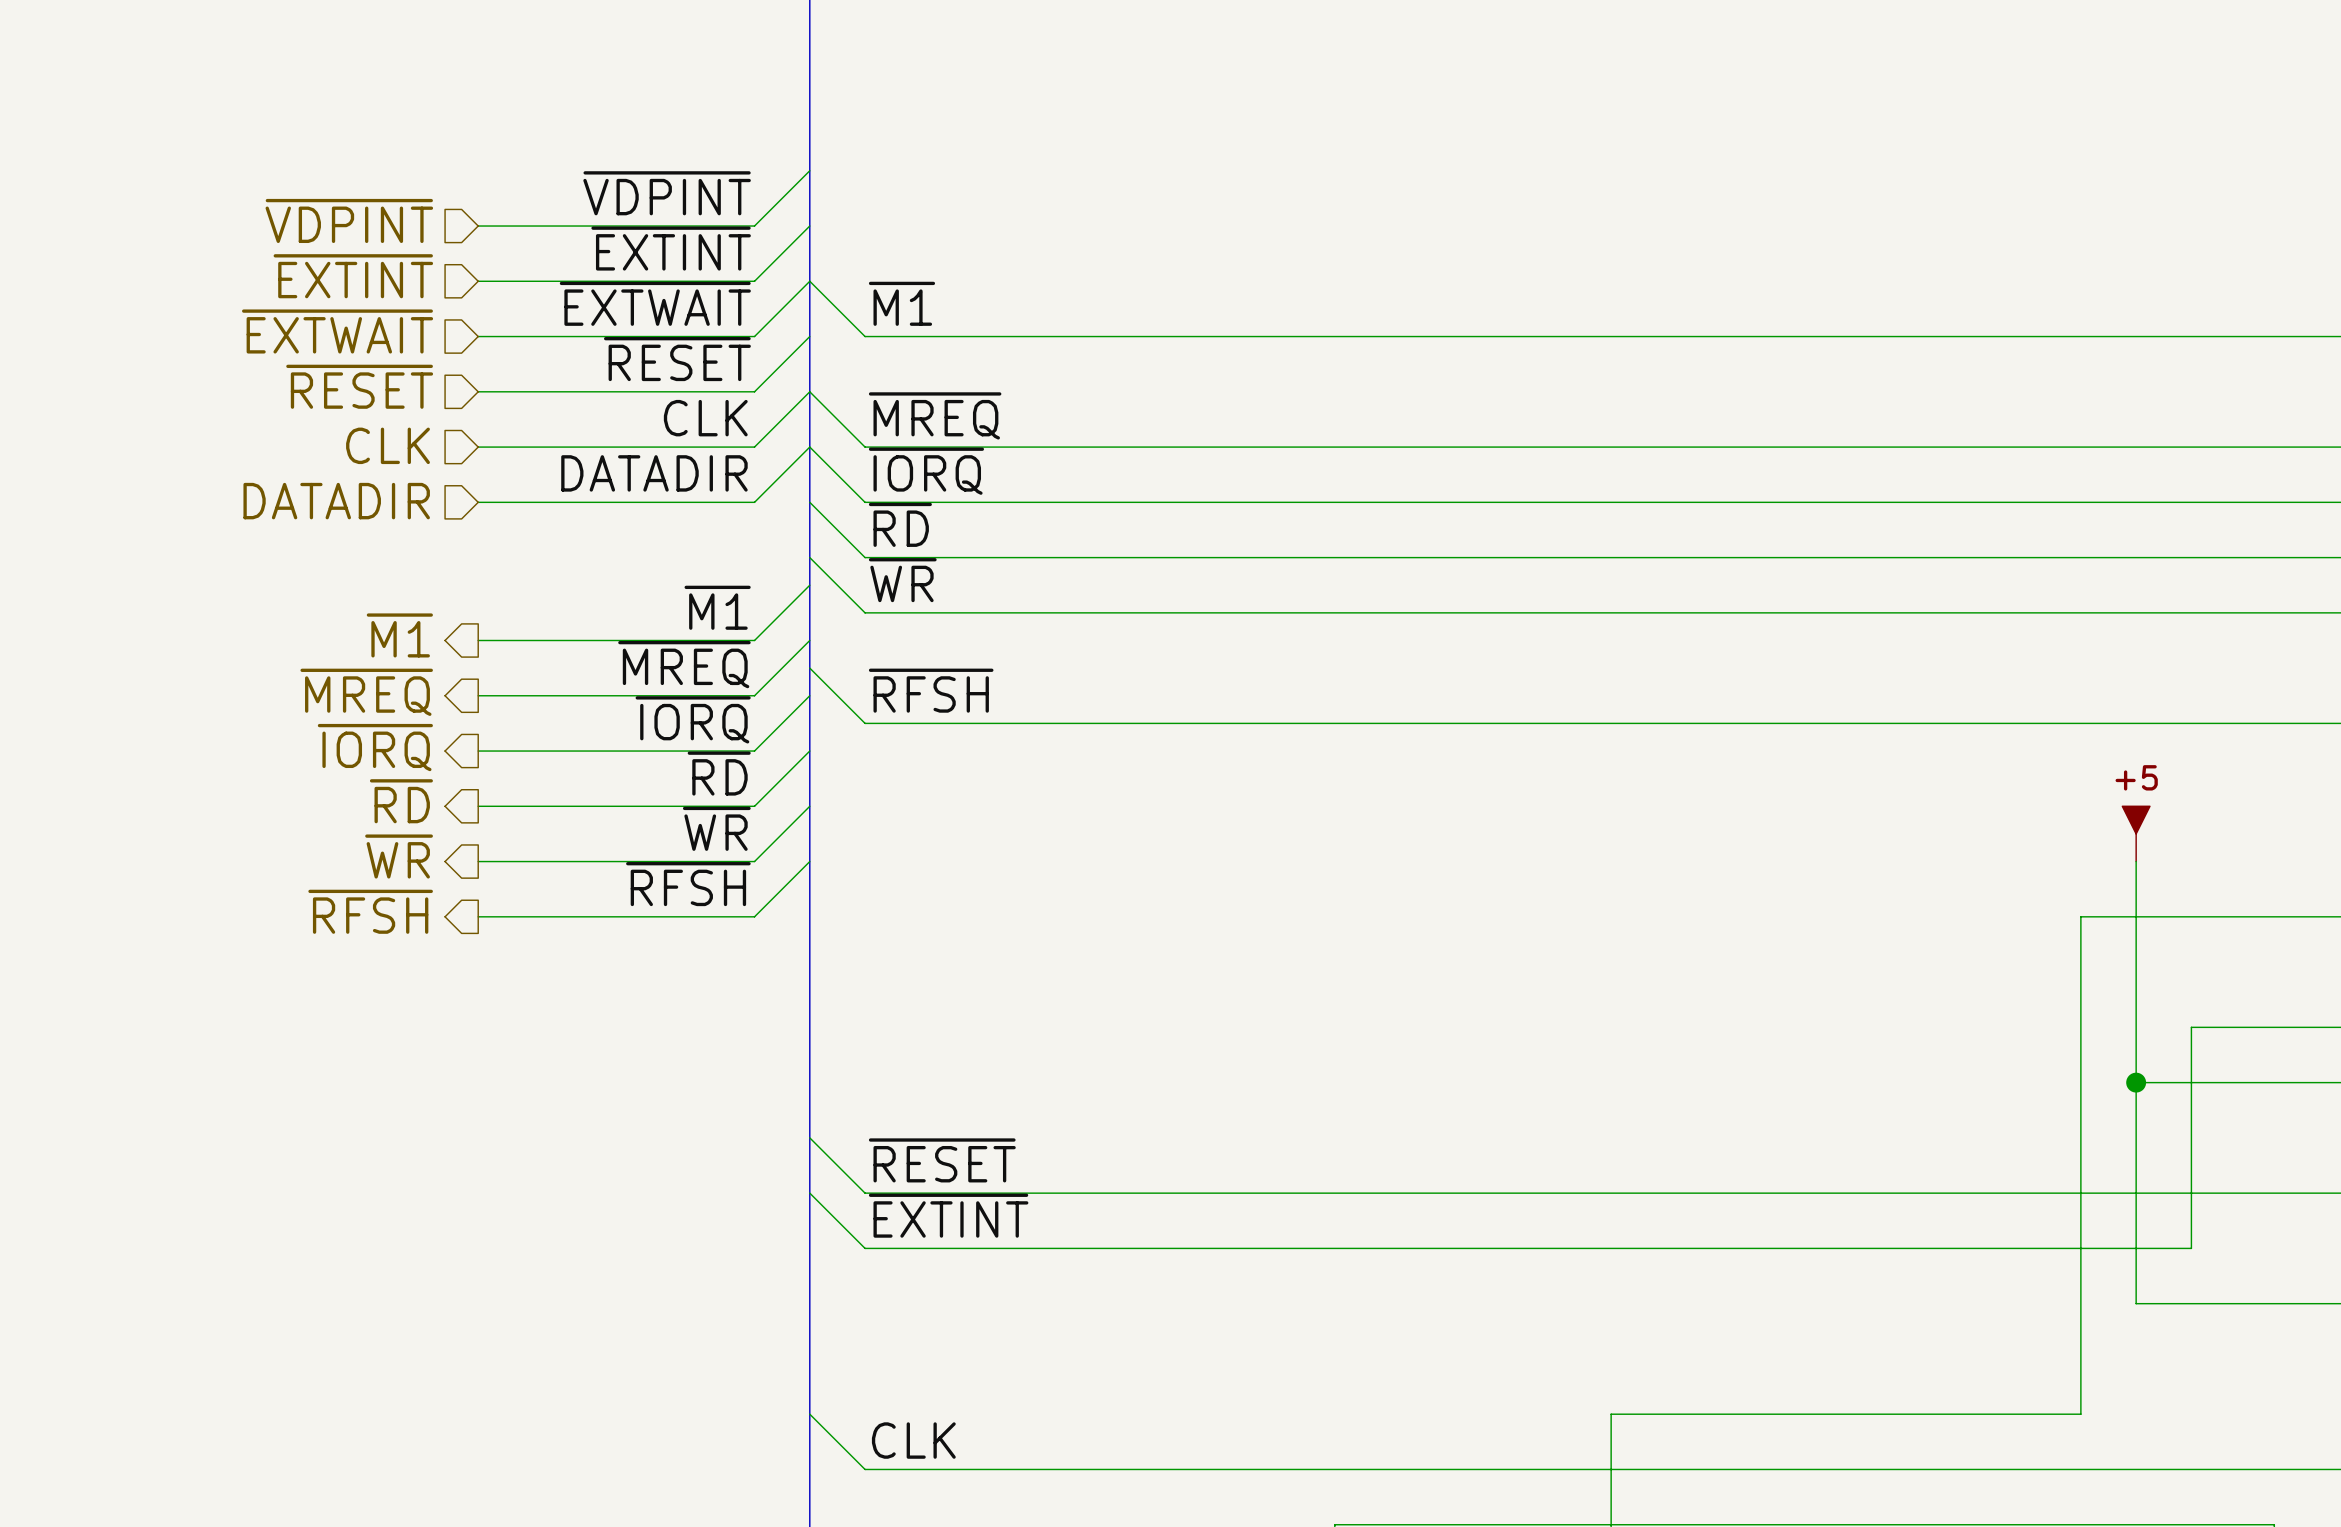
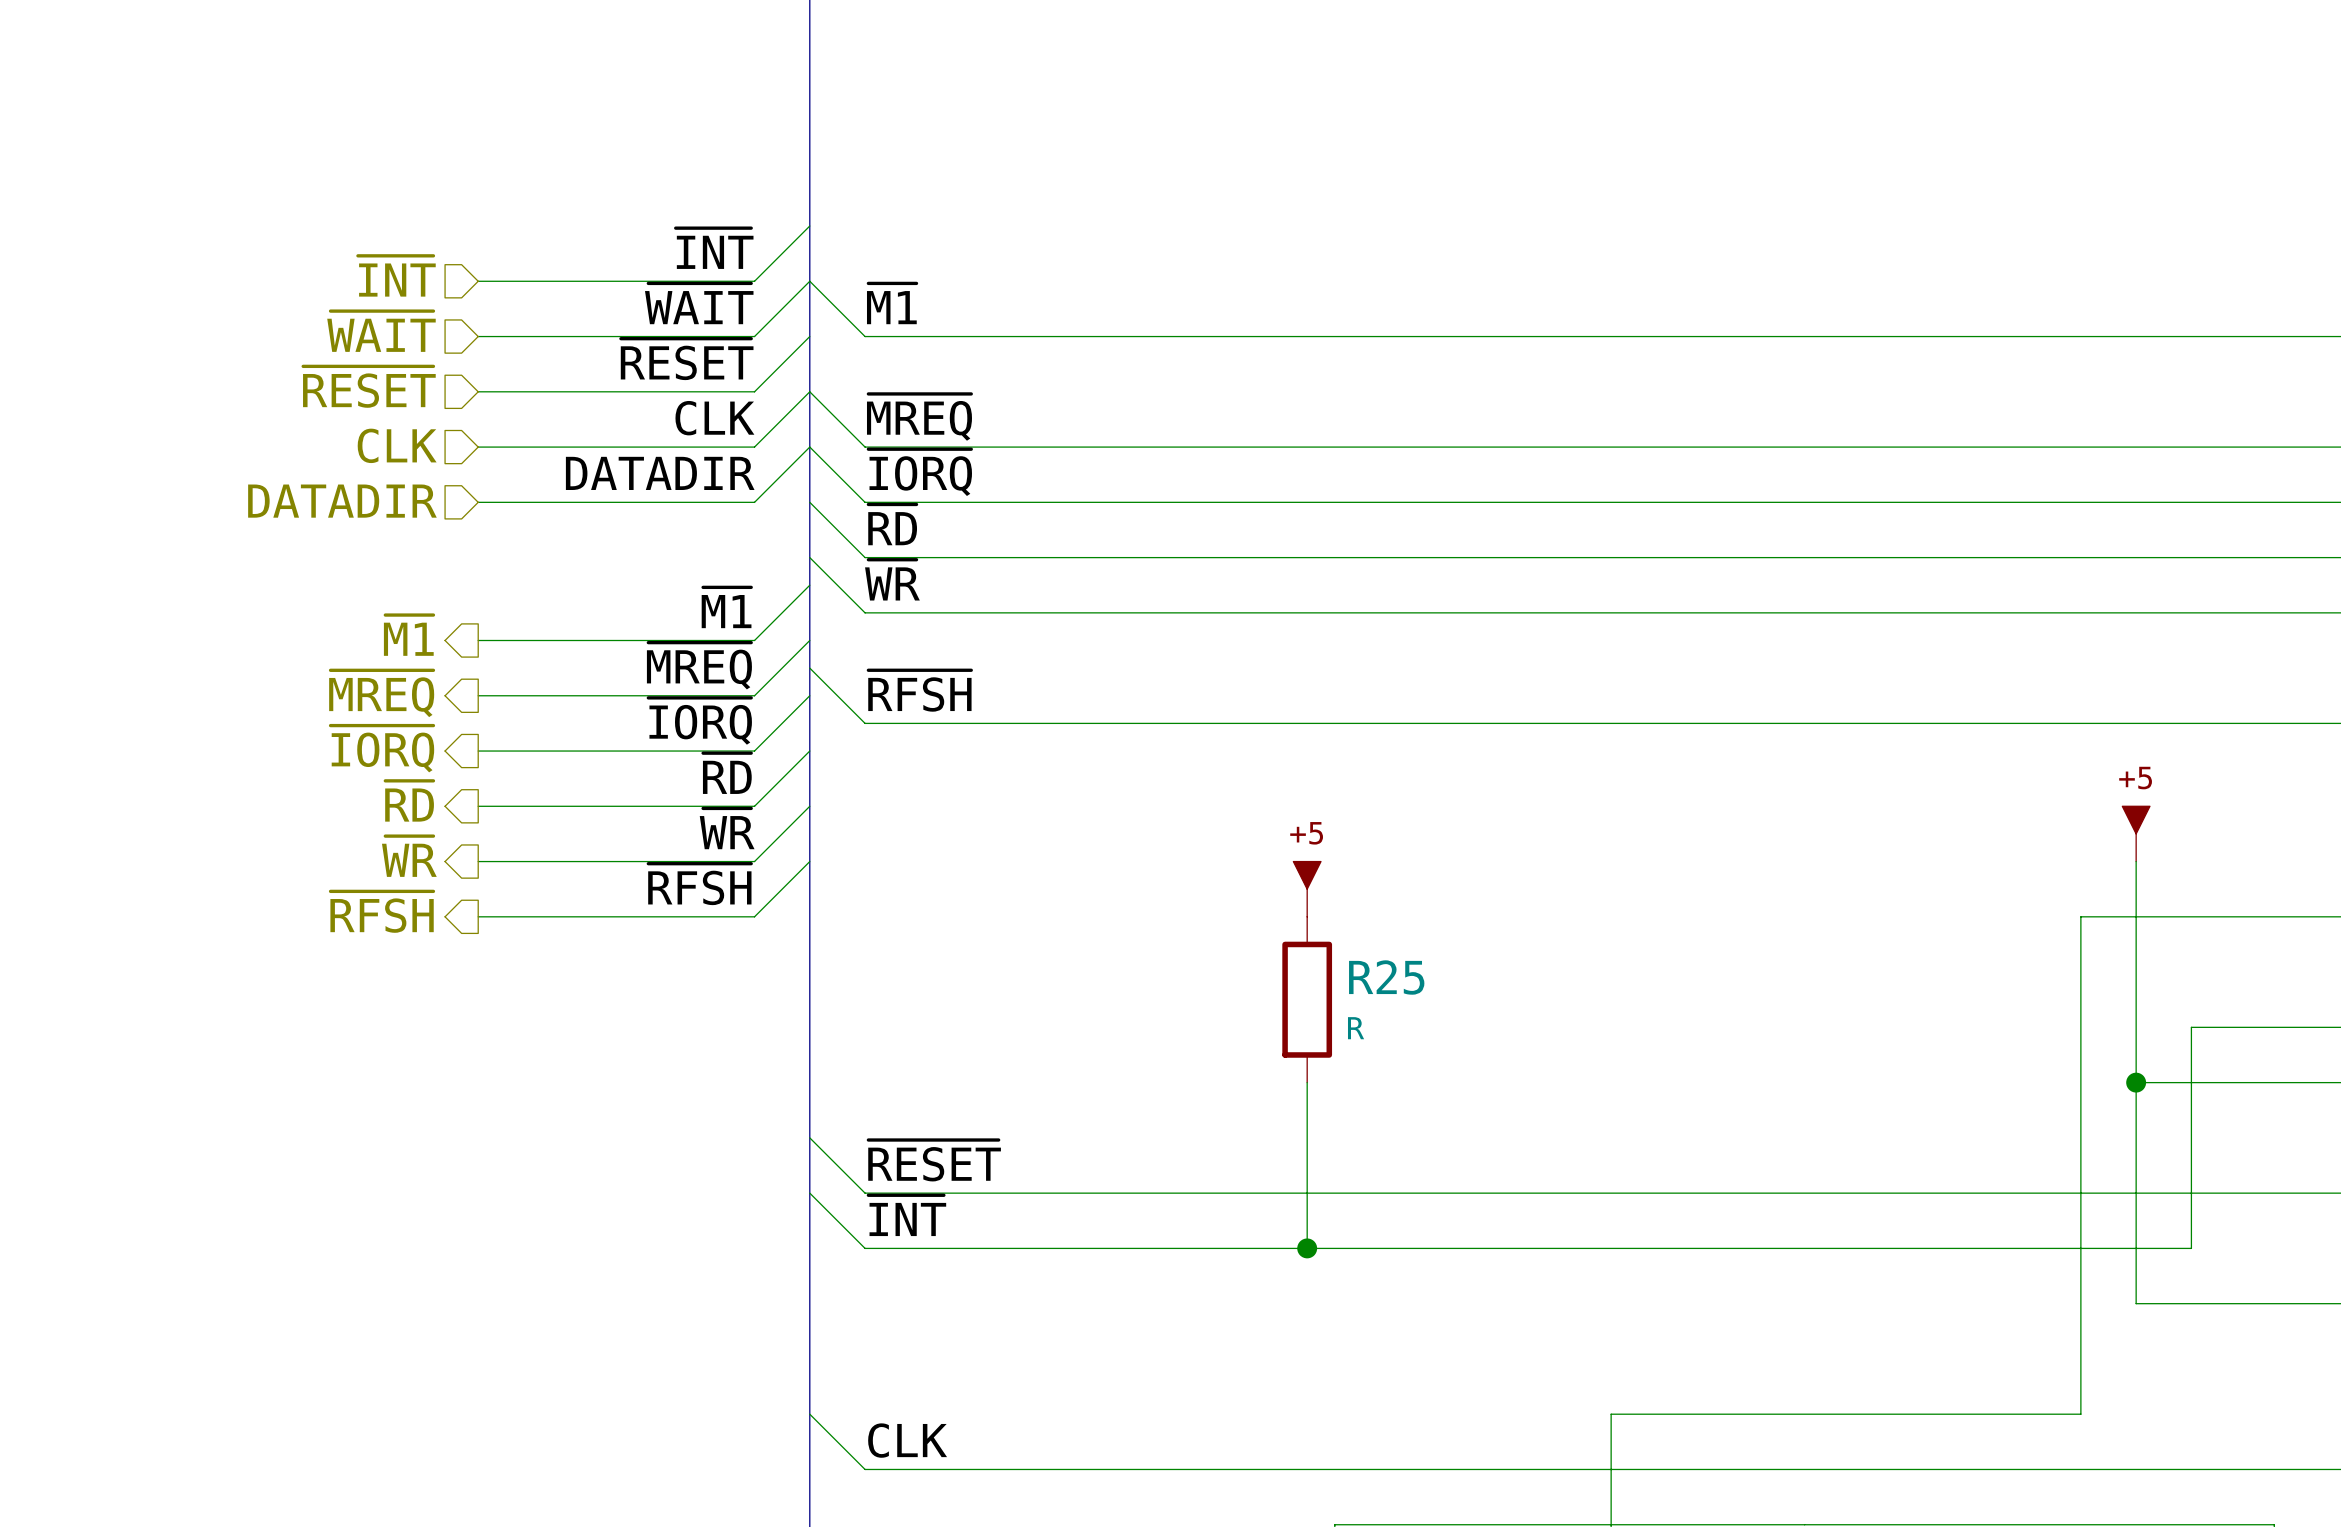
wire: (809, 170) (754, 226) (478, 226) -> none
label: ~{VDPINT} (667, 193) -> none
hierarchical label: ~{VDPINT} (349, 220) -> none
label: ~{EXTINT} (671, 248) -> ~{INT} (714, 248)
hierarchical label: ~{EXTINT} (353, 276) -> ~{INT} (396, 276)
label: ~{EXTWAIT} (655, 303) -> ~{WAIT} (699, 303)
hierarchical label: ~{EXTWAIT} (337, 331) -> ~{WAIT} (381, 331)
power symbol: none -> (1307, 889)
R25: none -> R (1307, 999)
wire: none -> (1307, 1082) (1307, 1248)
label: ~{EXTINT} (948, 1215) -> ~{INT} (907, 1215)
junction: none -> (1307, 1248)

